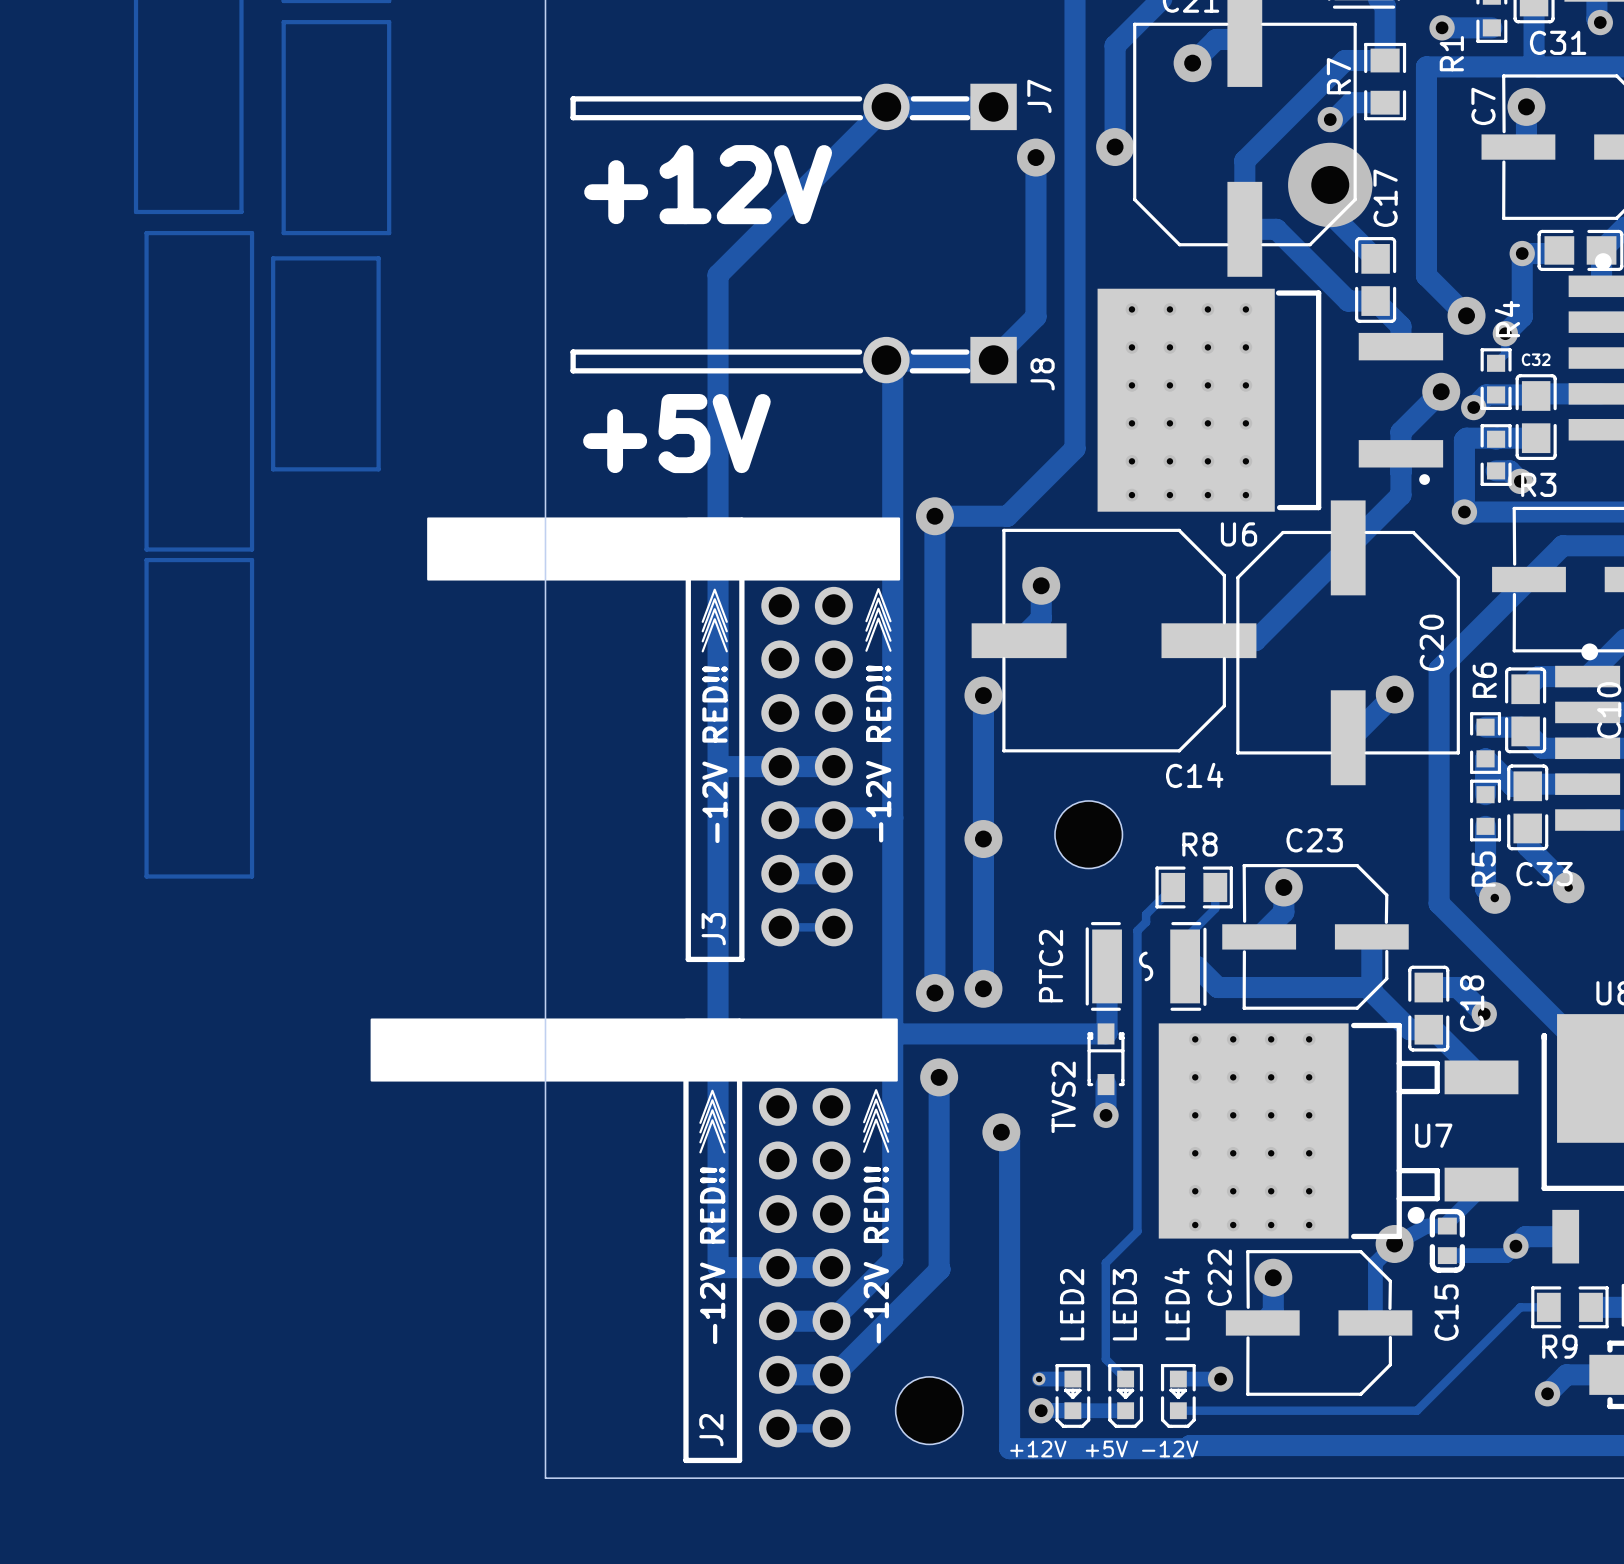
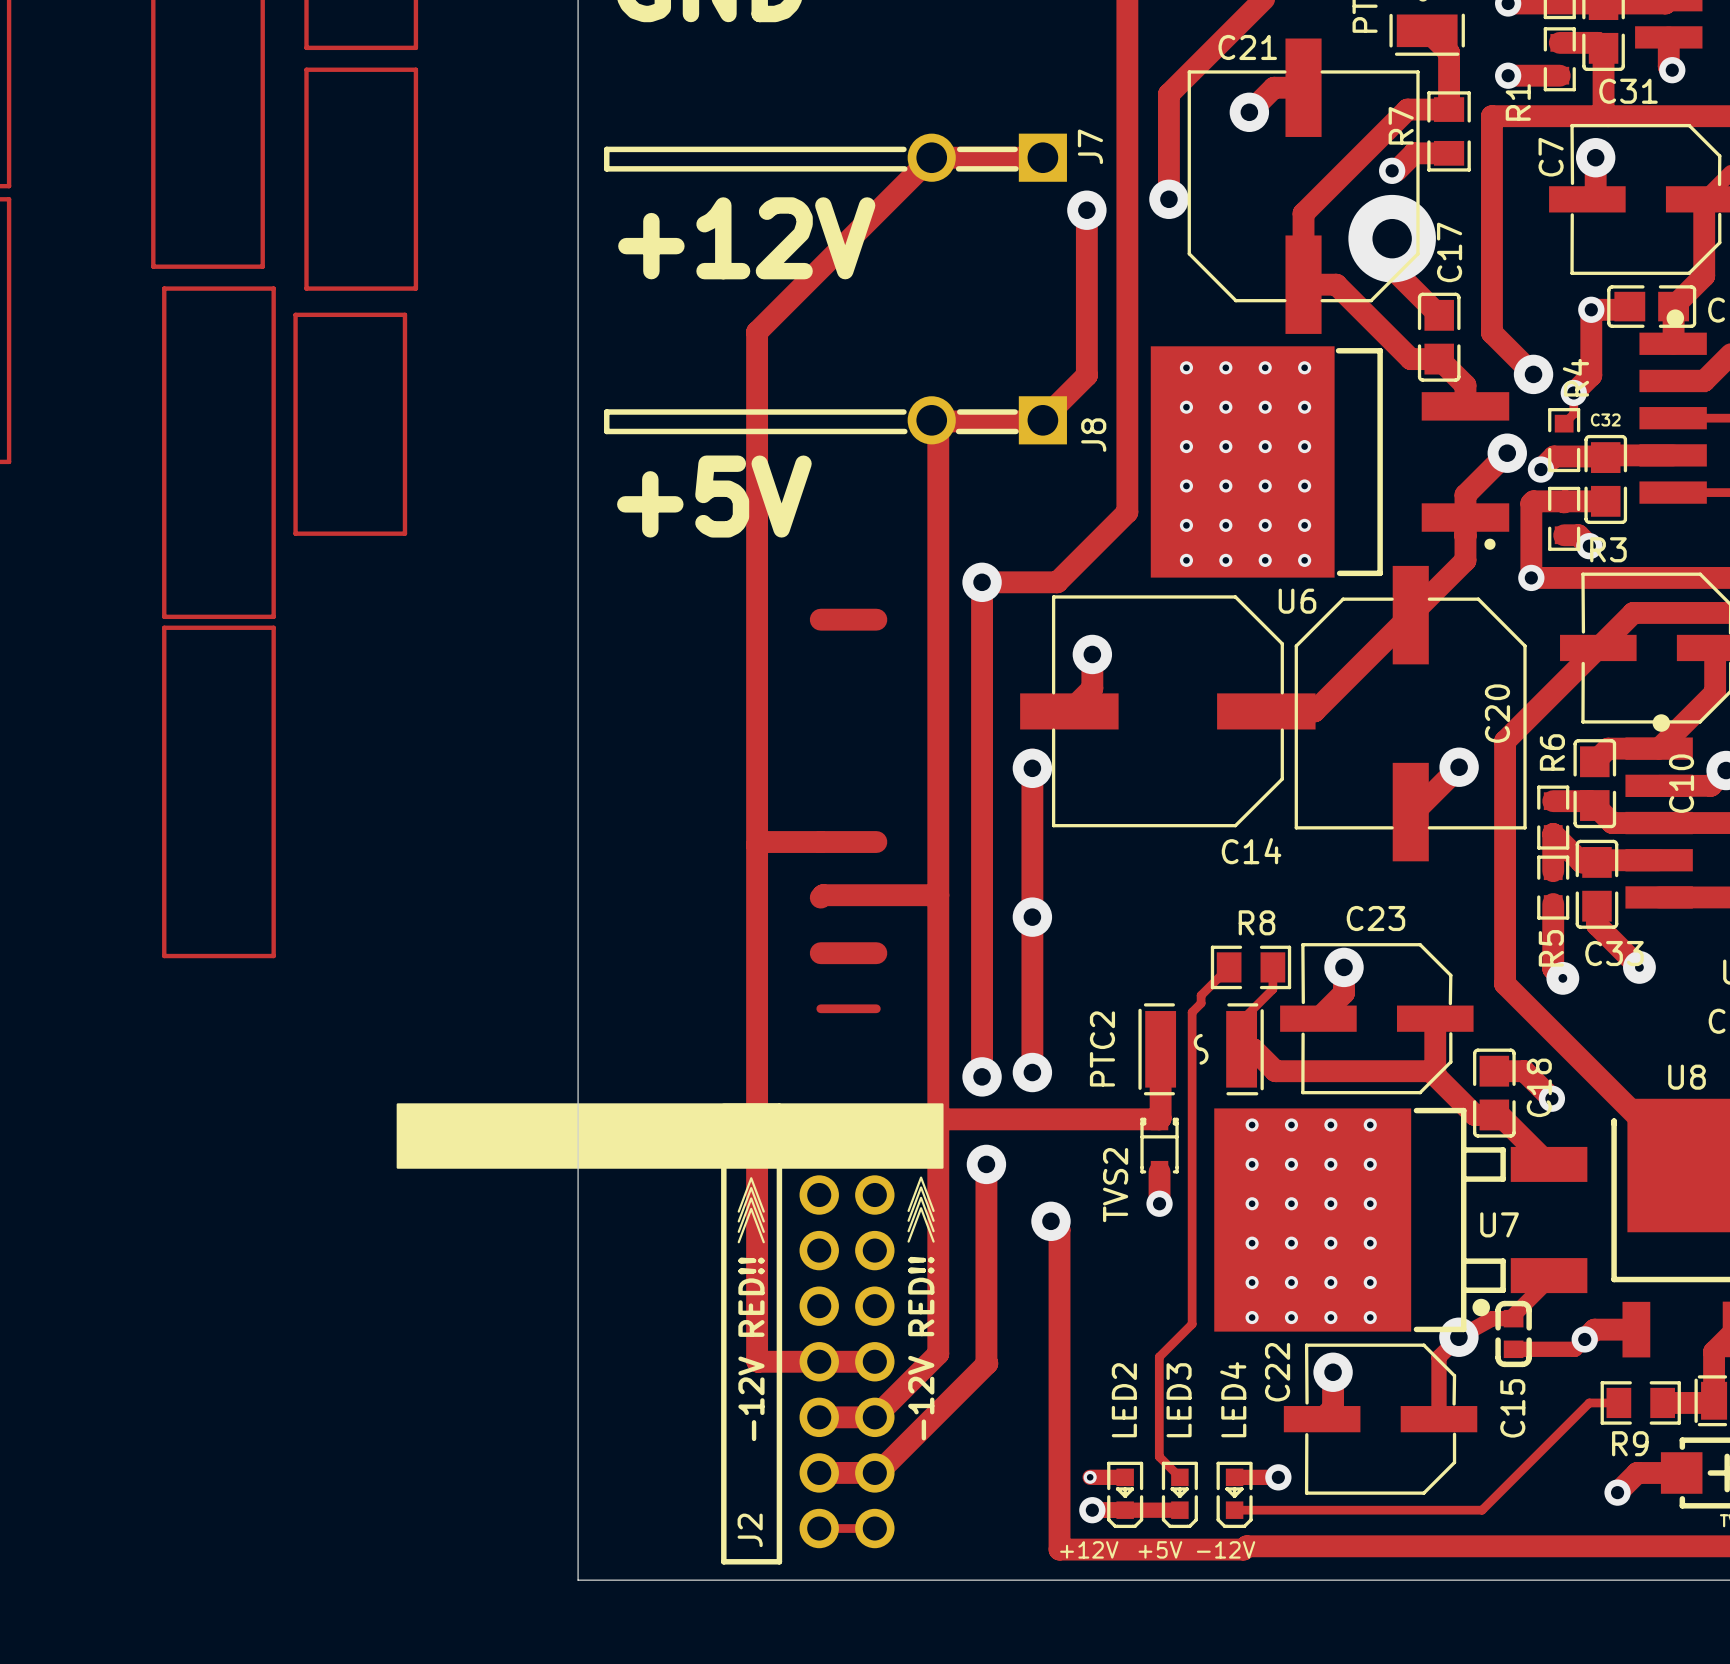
J3: (663, 739) -> none
part: (1088, 834) -> none
part: (929, 1410) -> none

